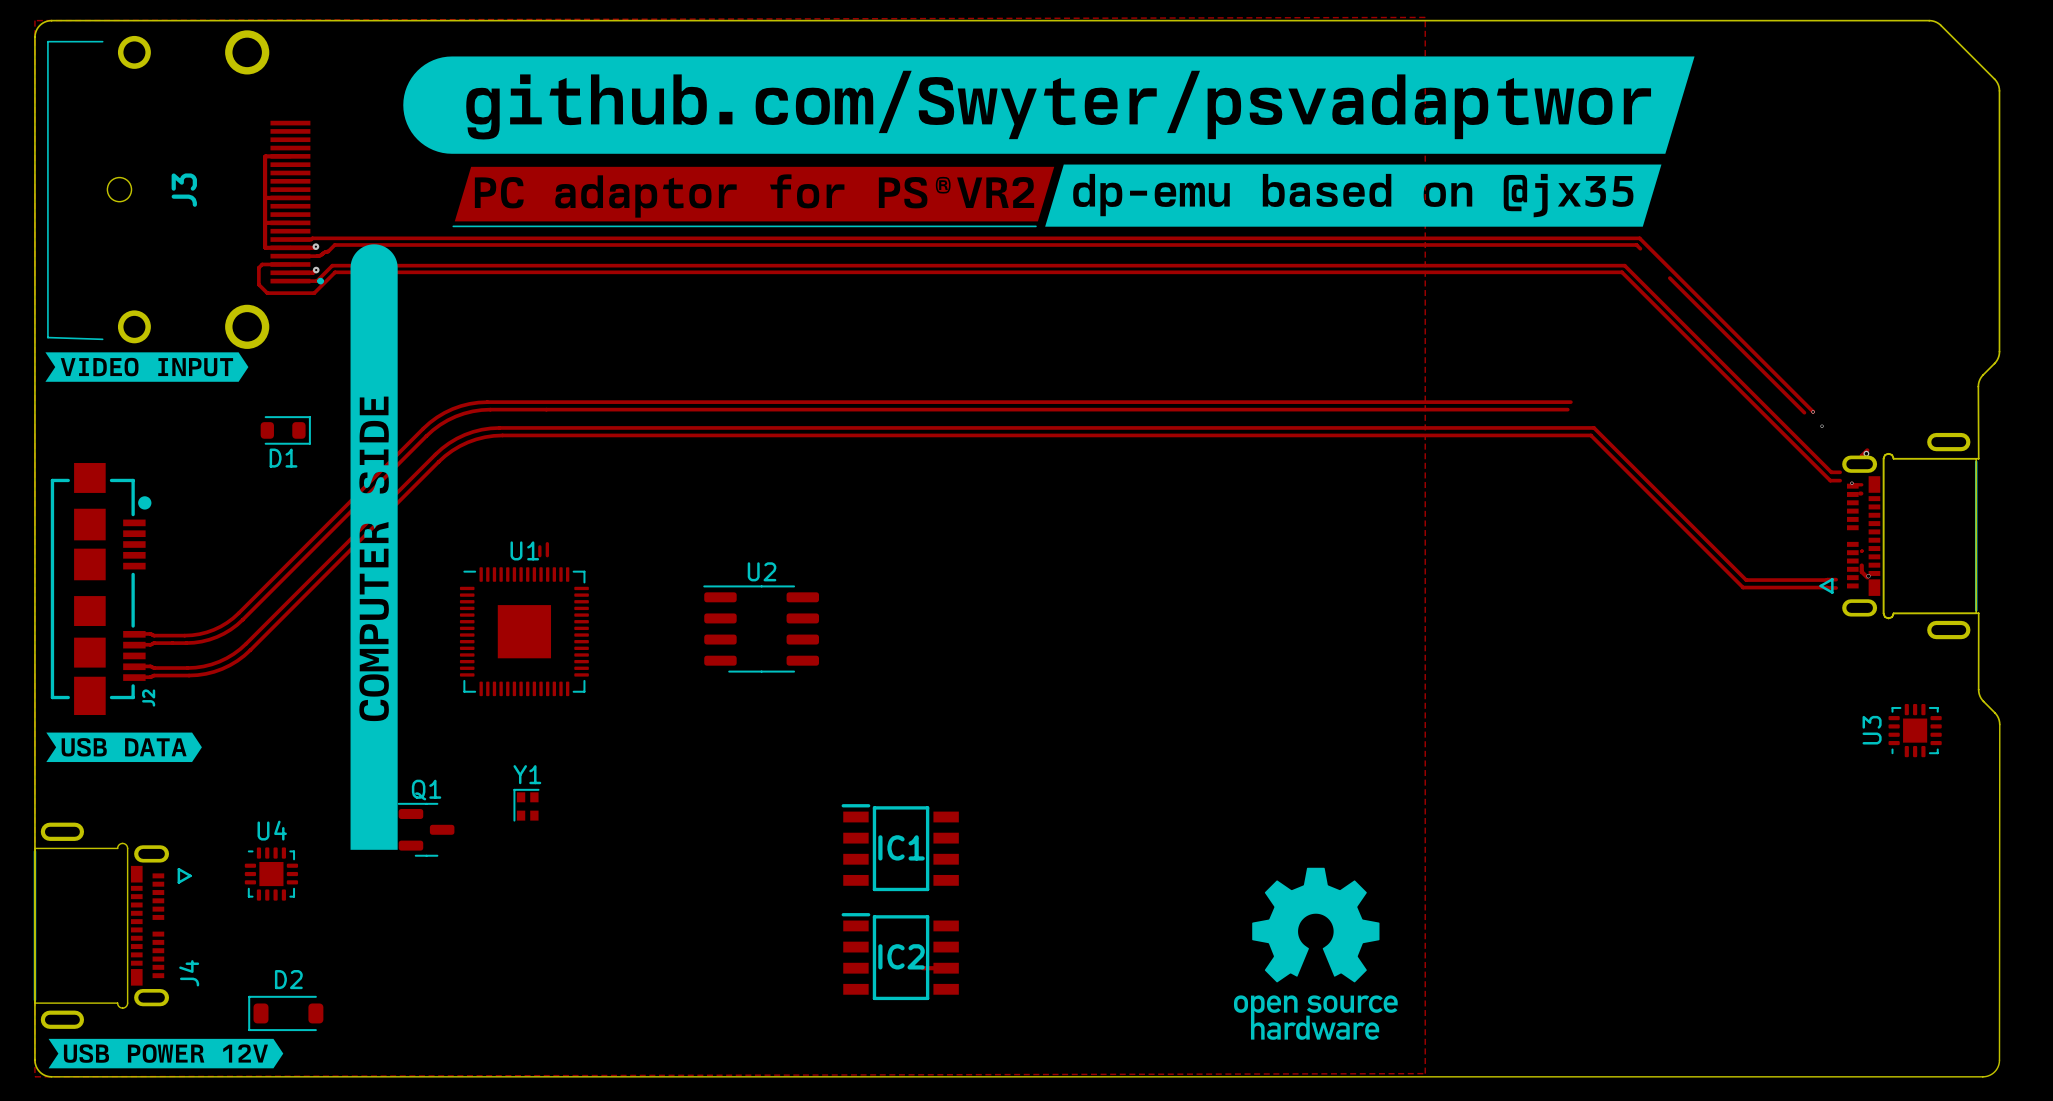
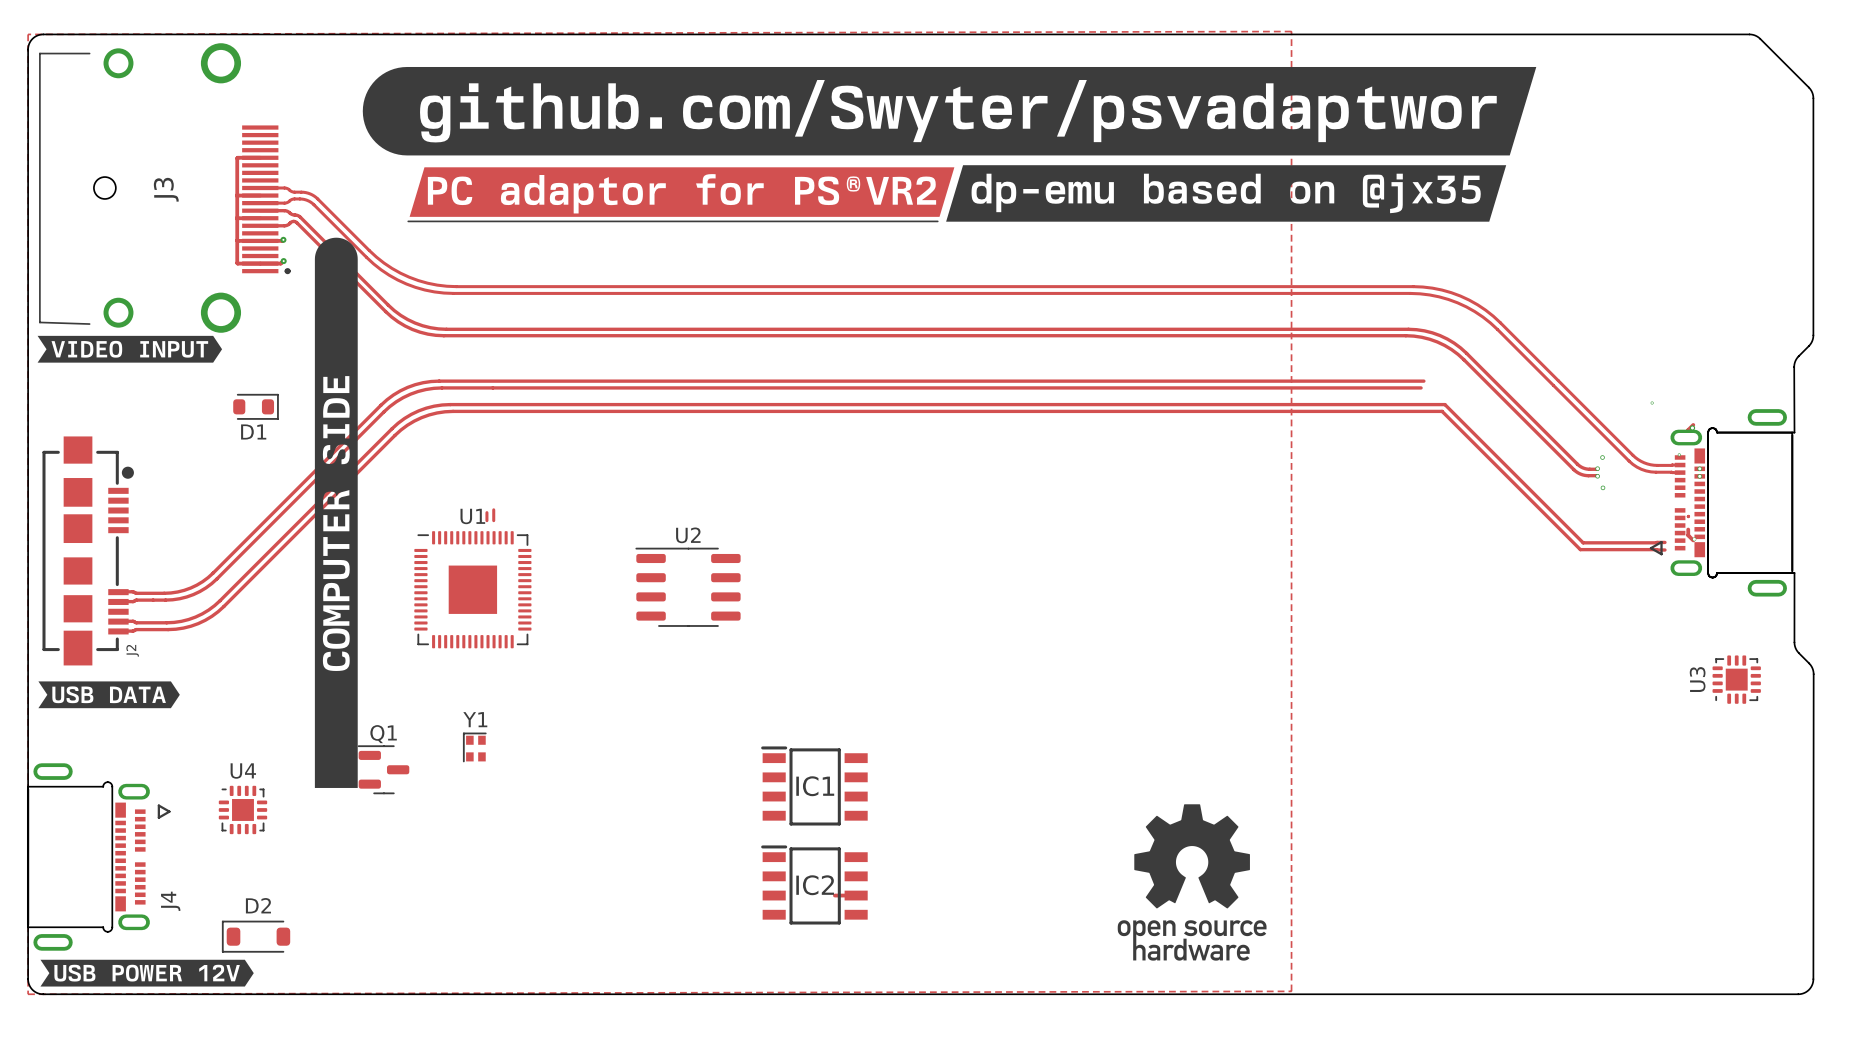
track: none -> (260, 188) (285, 188) (292, 191) (312, 194) (384, 263) (400, 273) (418, 280) (446, 286) (1432, 288) (1451, 292) (1469, 300) (1493, 316) (1638, 459) (1654, 465) (1680, 465)
track: none -> (260, 203) (285, 203) (294, 198) (309, 201) (381, 269) (397, 279) (415, 287) (444, 293) (1429, 294) (1448, 299) (1466, 306) (1490, 322) (1632, 464) (1651, 471) (1680, 472)
track: none -> (260, 210) (285, 210) (294, 215)
track: none -> (295, 215) (300, 217) (394, 310) (415, 323) (438, 328) (1408, 329) (1424, 330) (1439, 335) (1460, 347) (1578, 465) (1586, 468) (1597, 468)
track: none -> (260, 225) (285, 225) (292, 221) (296, 222) (391, 317) (412, 329) (435, 335) (1405, 335) (1421, 337) (1444, 345) (1458, 354) (1575, 470) (1584, 475) (1597, 476)
track: (290, 239) (1639, 238) (1813, 411) -> none
track: none -> (237, 240) (237, 263) (260, 263)
track: (1640, 248) (1636, 244) (334, 244) (328, 251) (318, 256) (290, 256) -> none
track: (290, 264) (262, 264) (258, 267) (258, 284) (267, 293) (314, 293) (335, 272) (1622, 272) (1830, 480) (1840, 480) -> none
track: (1669, 278) (1804, 412) -> none
track: (290, 281) (316, 281) (332, 265) (1624, 265) (1831, 472) (1840, 472) -> none
via: (1813, 411) -> none
track: (1851, 483) (1861, 484) -> none
via: none -> (1602, 457)
track: (1860, 493) (1861, 493) -> none
via: none -> (1597, 468)
via: none -> (1699, 468)
via: none -> (1597, 476)
via: none -> (1699, 476)
via: none -> (1602, 487)

